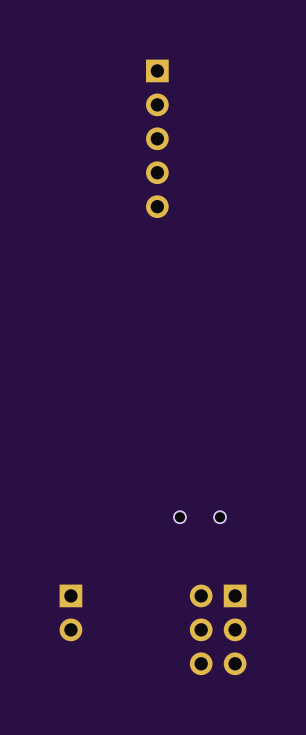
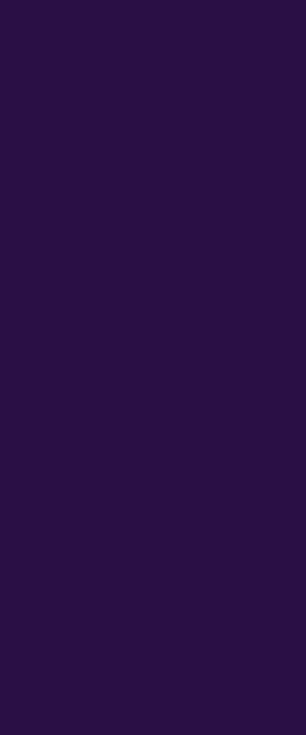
part: (157, 138) -> none
part: (199, 517) -> none
part: (70, 612) -> none
part: (218, 629) -> none

